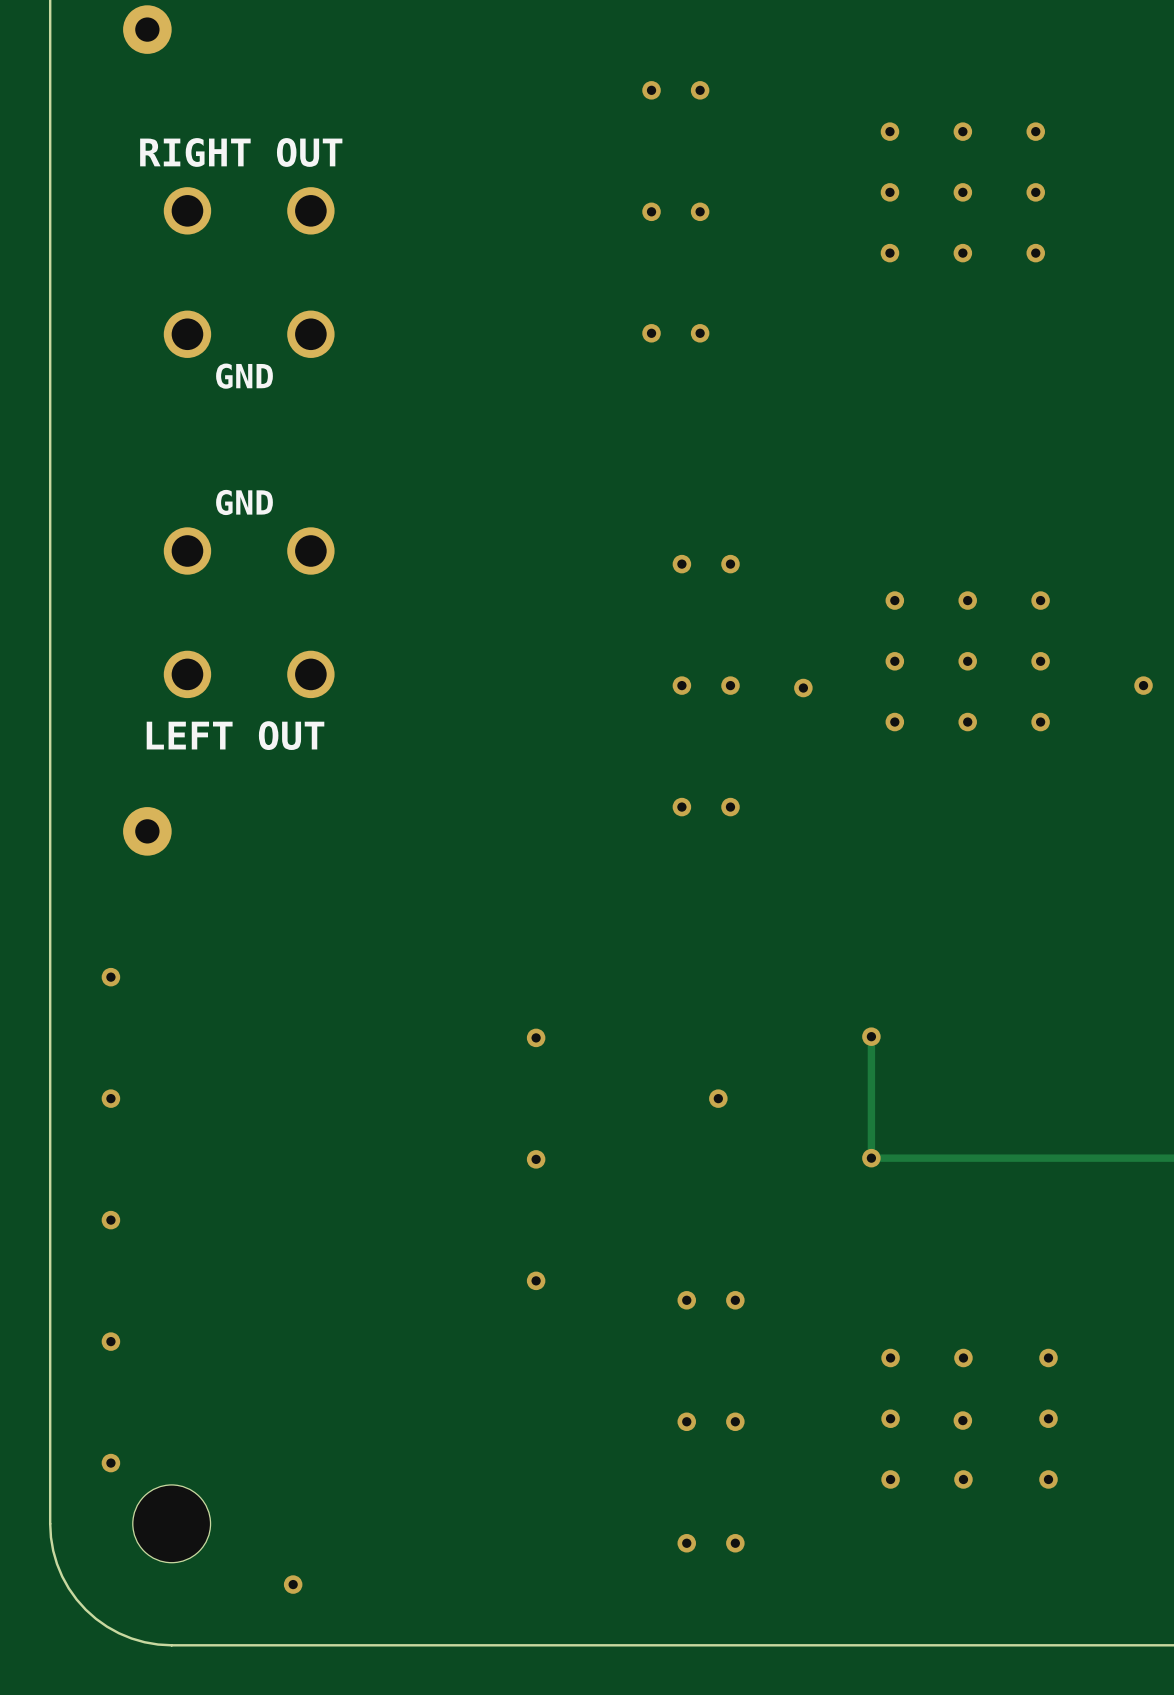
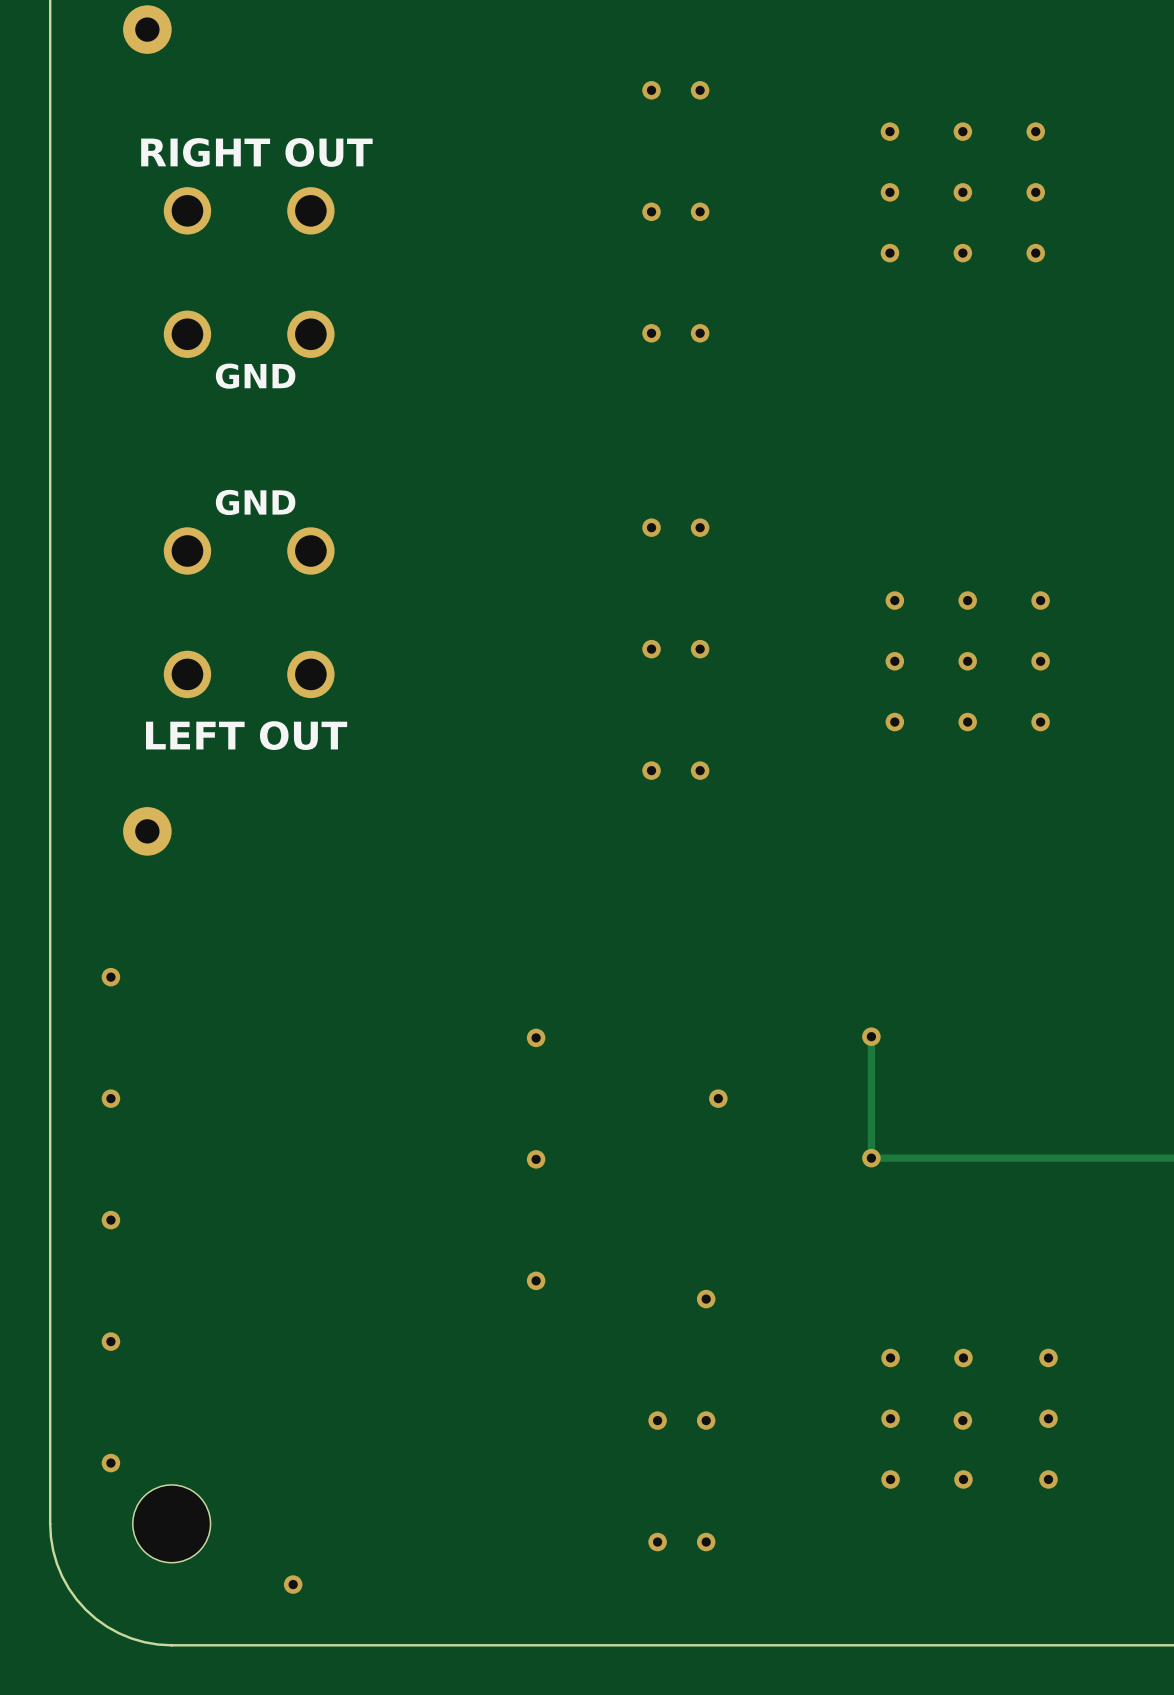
via: none -> (651, 527)
via: none -> (700, 527)
via: (681, 564) -> none
via: (730, 564) -> none
via: none -> (651, 649)
via: none -> (700, 649)
via: (681, 685) -> none
via: (730, 685) -> none
via: (1143, 685) -> none
via: (803, 688) -> none
via: none -> (651, 770)
via: none -> (700, 770)
via: (681, 807) -> none
via: (730, 807) -> none
via: none -> (706, 1299)
via: (686, 1300) -> none
via: (735, 1300) -> none
via: none -> (657, 1420)
via: none -> (706, 1420)
via: (686, 1421) -> none
via: (735, 1421) -> none
via: none -> (657, 1542)
via: none -> (706, 1542)
via: (686, 1543) -> none
via: (735, 1543) -> none

